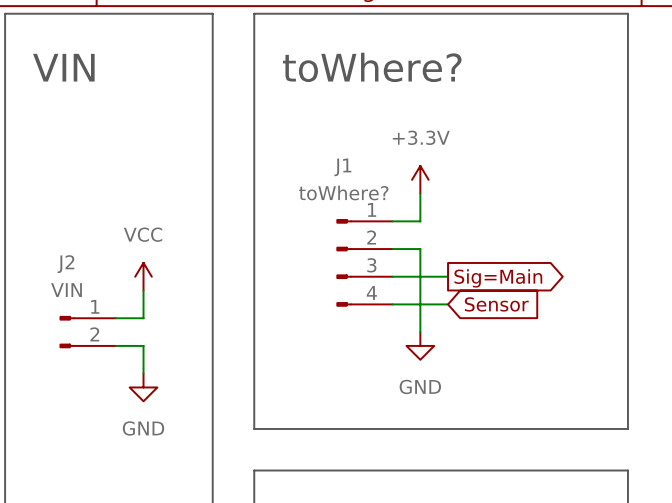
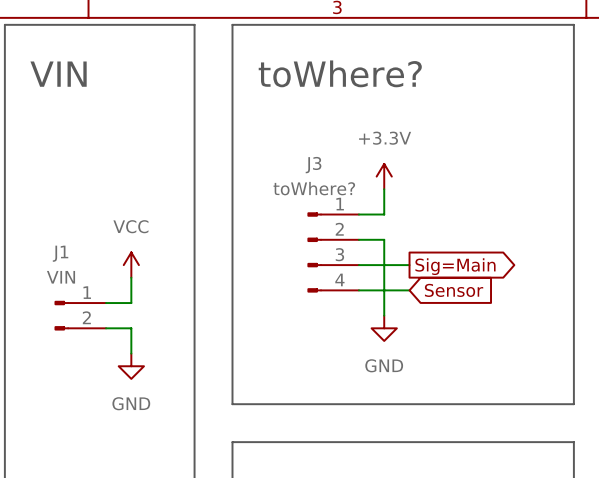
J1 name: J1 (342, 167) -> J3 (313, 165)
J2 name: J2 (65, 264) -> J1 (60, 253)

